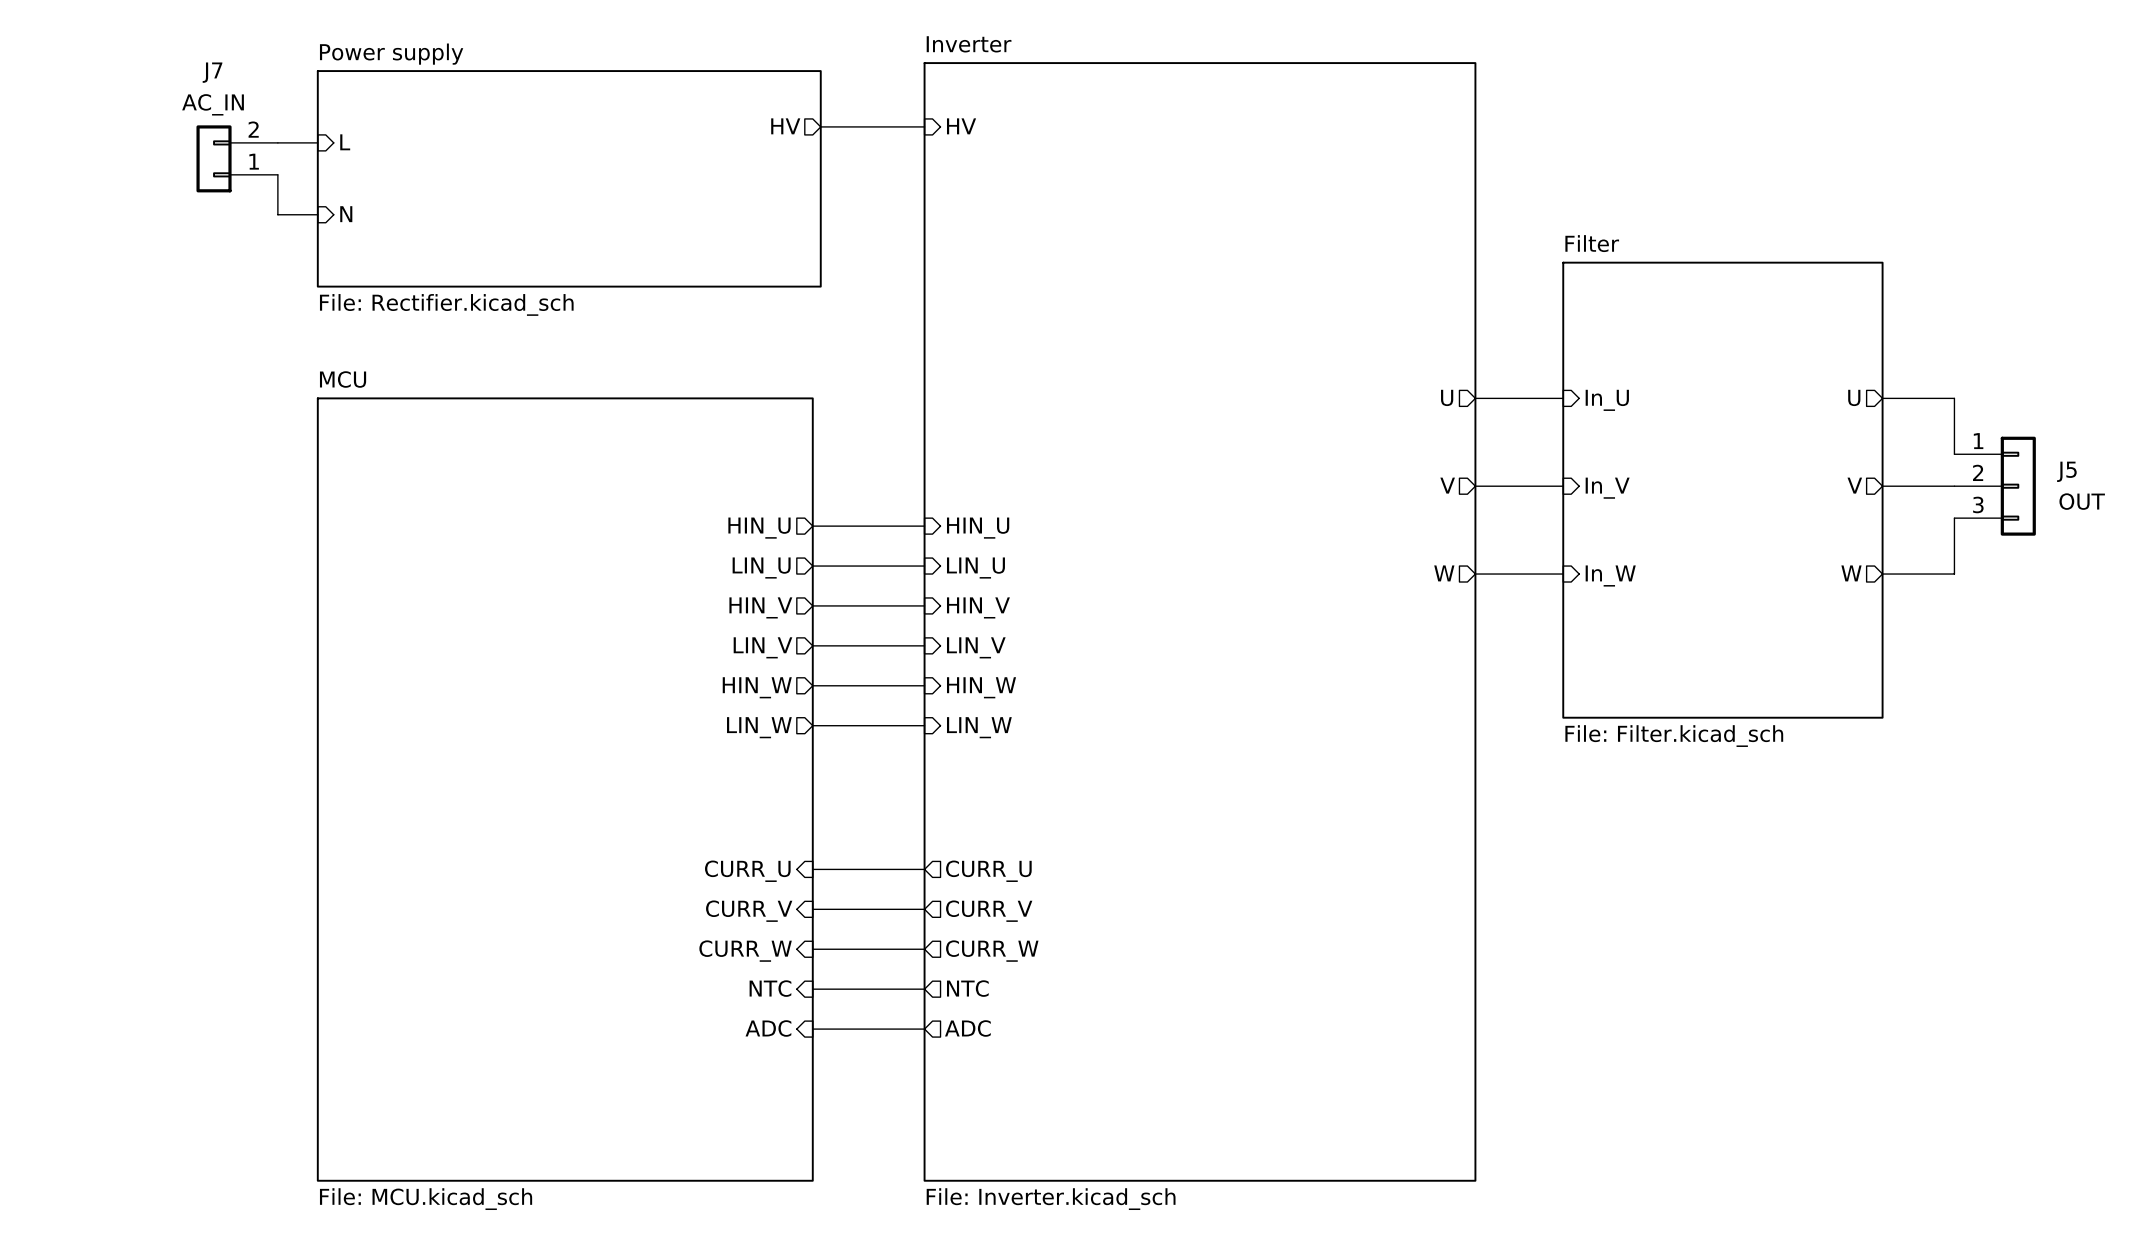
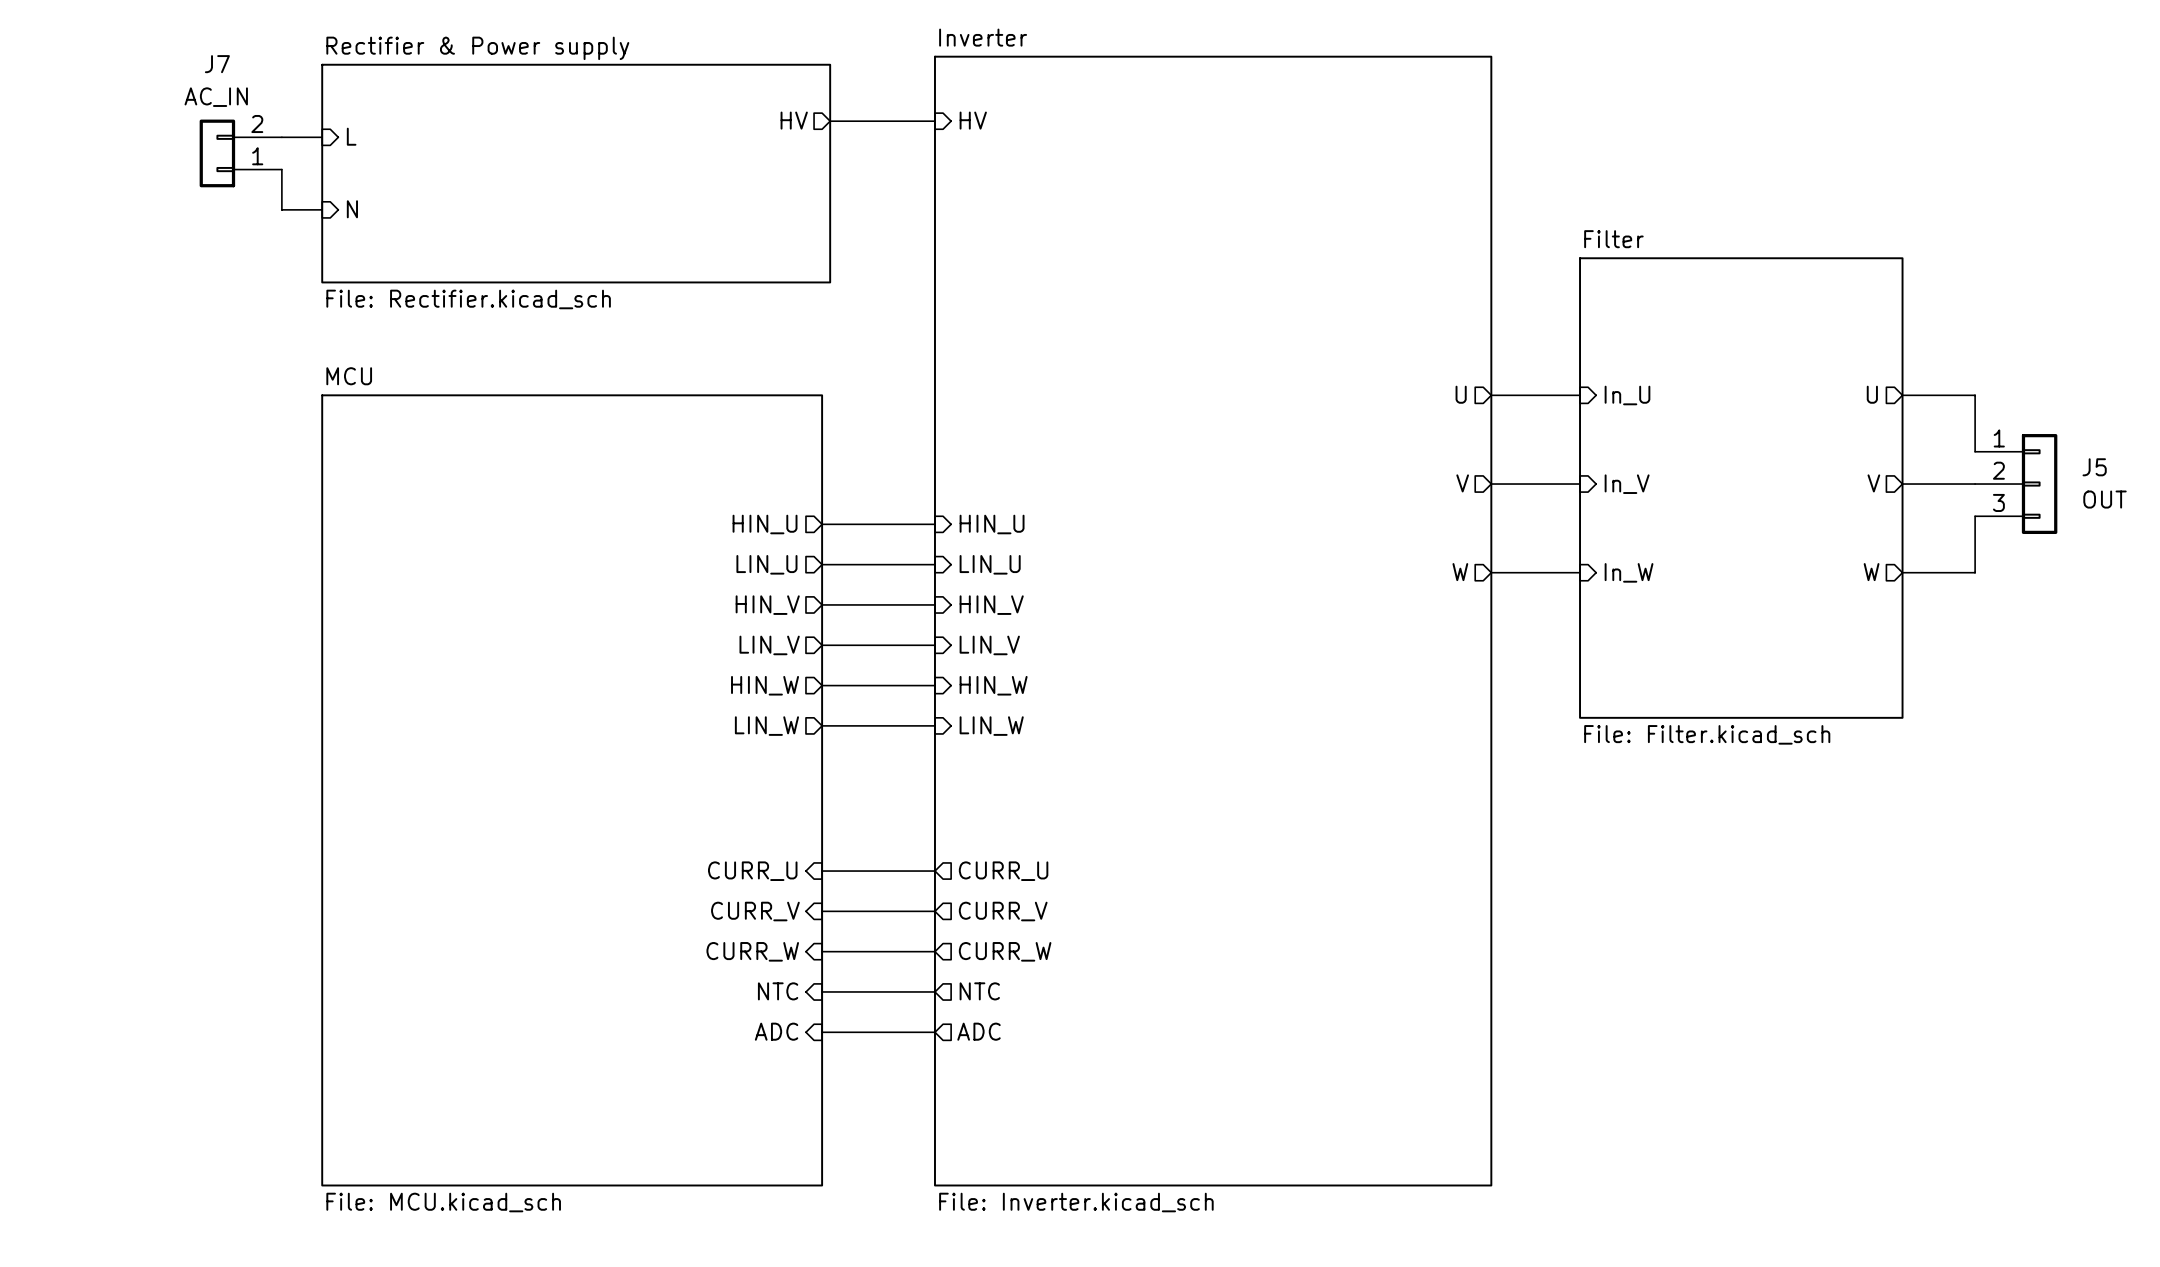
sheet Power supply name: Power supply (391, 54) -> Rectifier & Power supply (477, 48)

